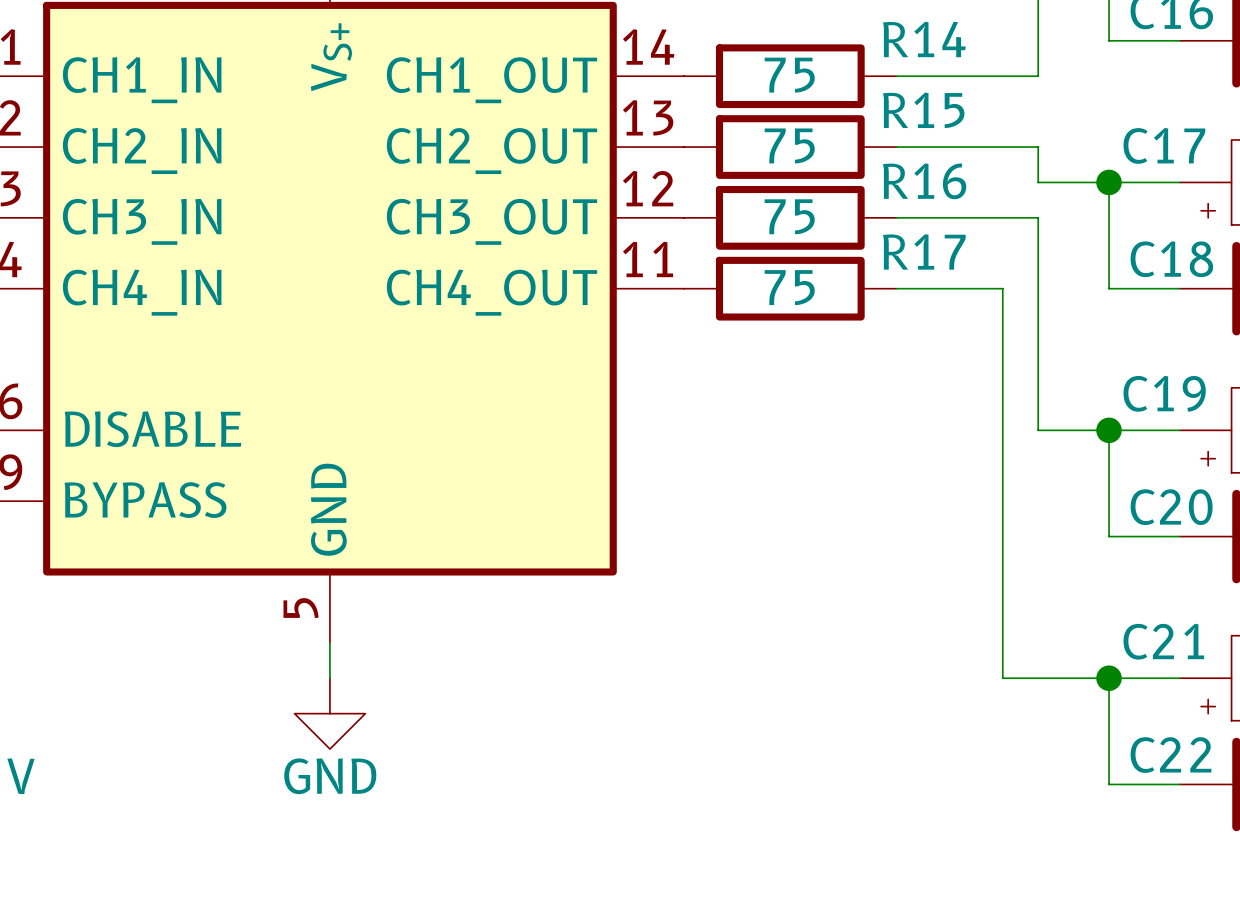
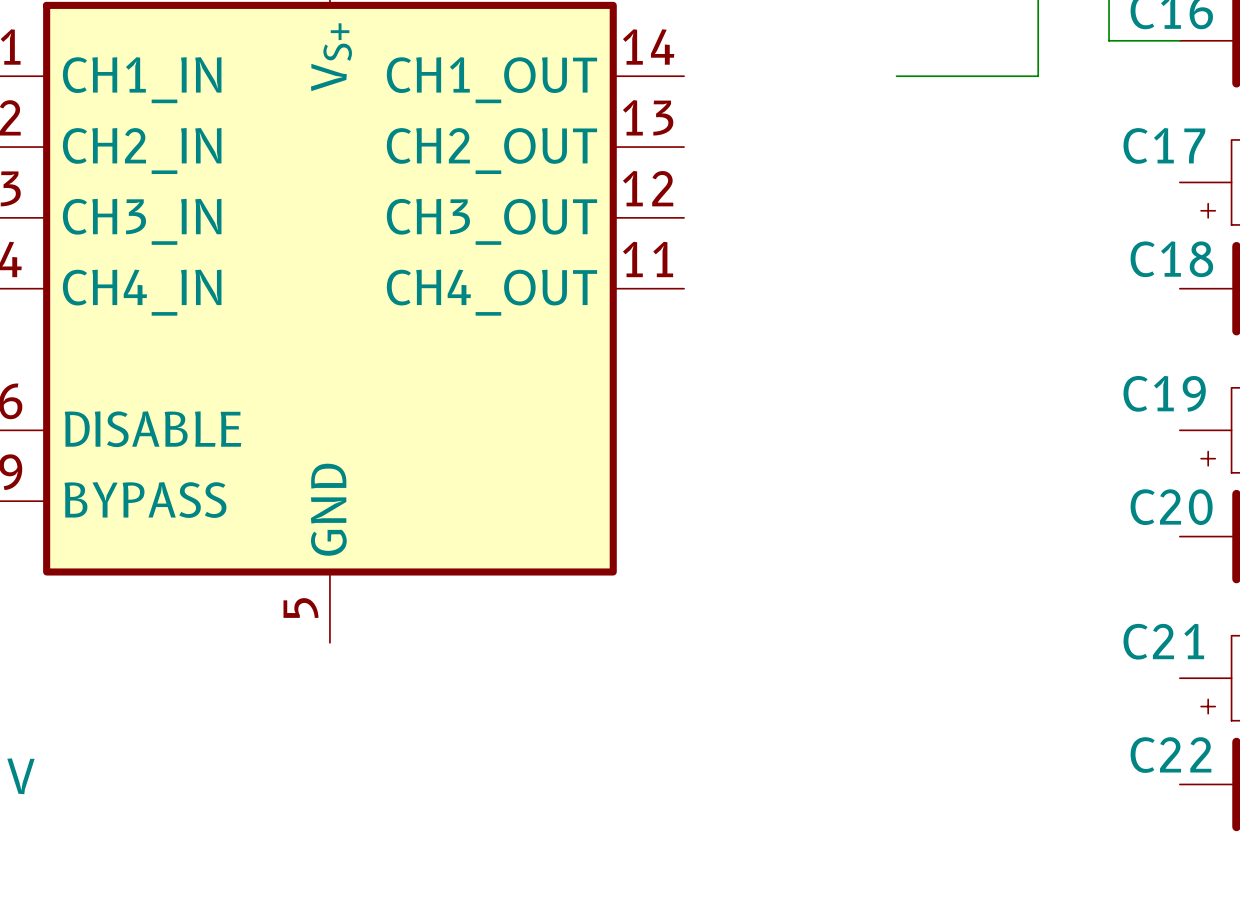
R14: 75 (790, 76) -> none
R15: 75 (790, 147) -> none
wire: (896, 147) (1038, 147) (1038, 182) (1179, 182) -> none
wire: (1109, 182) (1109, 288) (1179, 288) -> none
junction: (1109, 182) -> none
R16: 75 (790, 217) -> none
wire: (896, 217) (1038, 217) (1038, 430) (1179, 430) -> none
R17: 75 (790, 288) -> none
wire: (896, 288) (1002, 288) (1002, 678) (1179, 678) -> none
wire: (1109, 430) (1109, 536) (1179, 536) -> none
junction: (1109, 430) -> none
wire: (329, 642) (329, 678) -> none
wire: (1109, 678) (1109, 784) (1179, 784) -> none
junction: (1109, 678) -> none
power symbol: GND (329, 713) -> none

